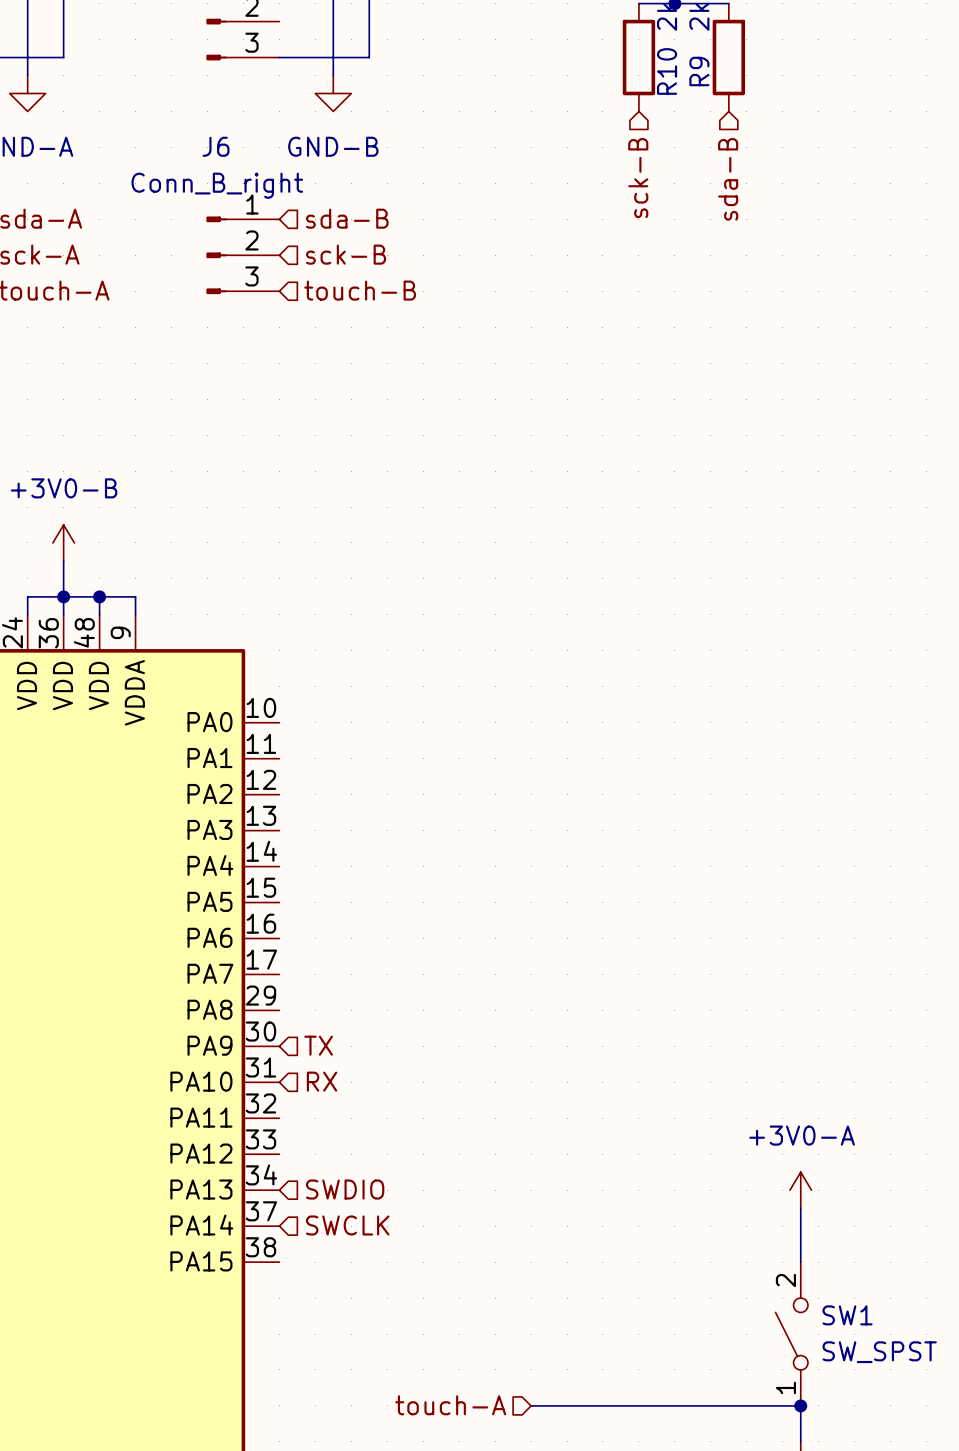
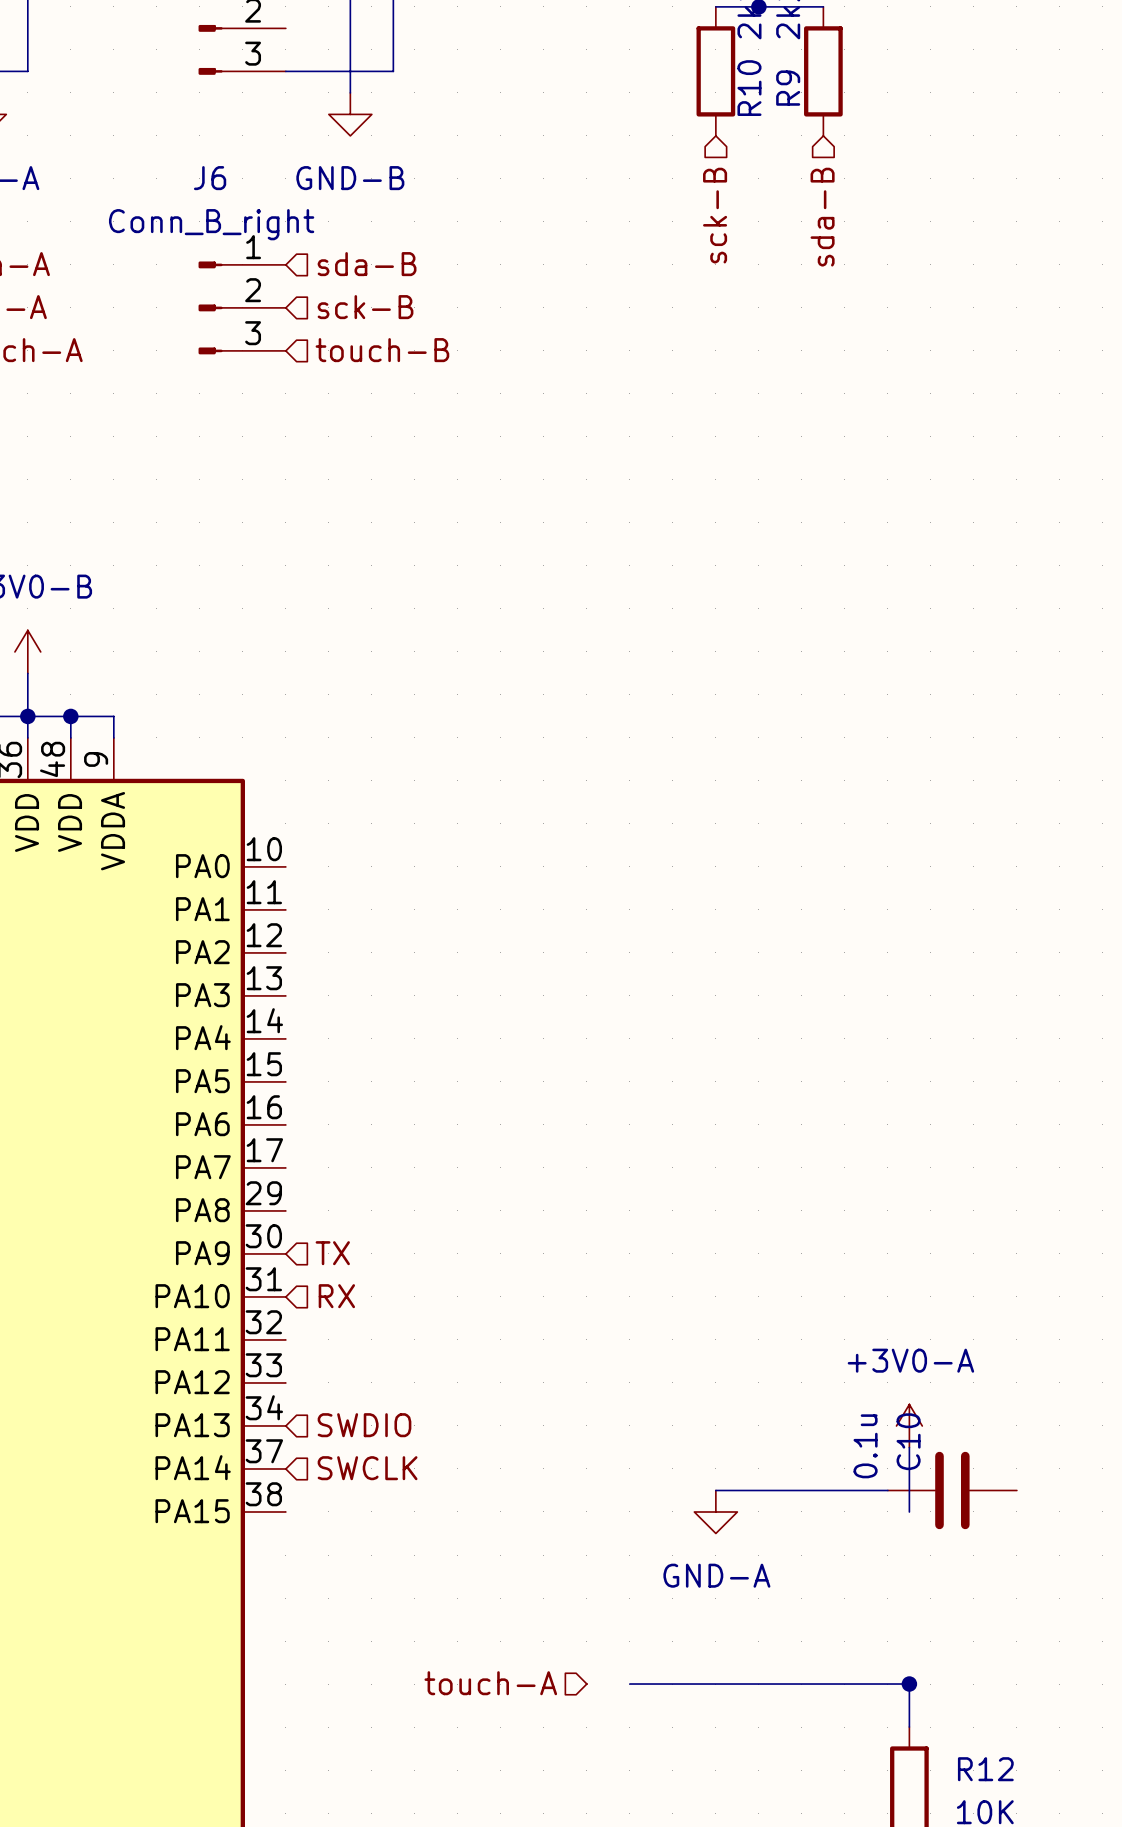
wire: none -> (715, 1490) (887, 1490)
C10: none -> 0.1u (952, 1490)
power symbol: none -> GND-A (715, 1511)
SW1: SW_SPST (791, 1334) -> none
wire: (531, 1405) (567, 1405) -> none

